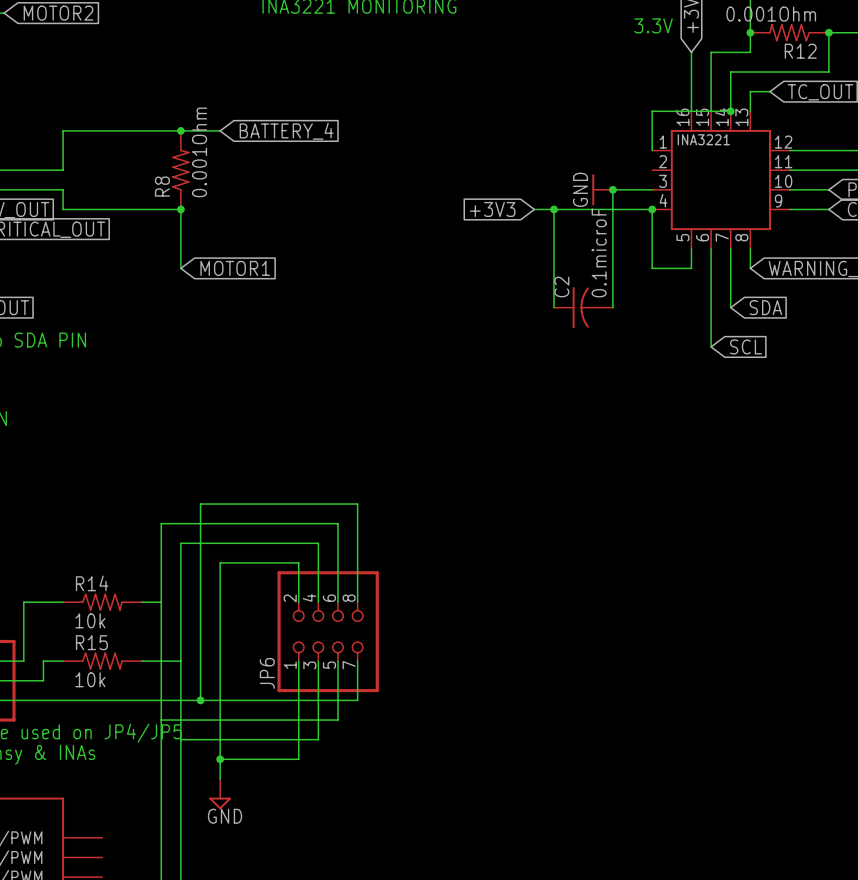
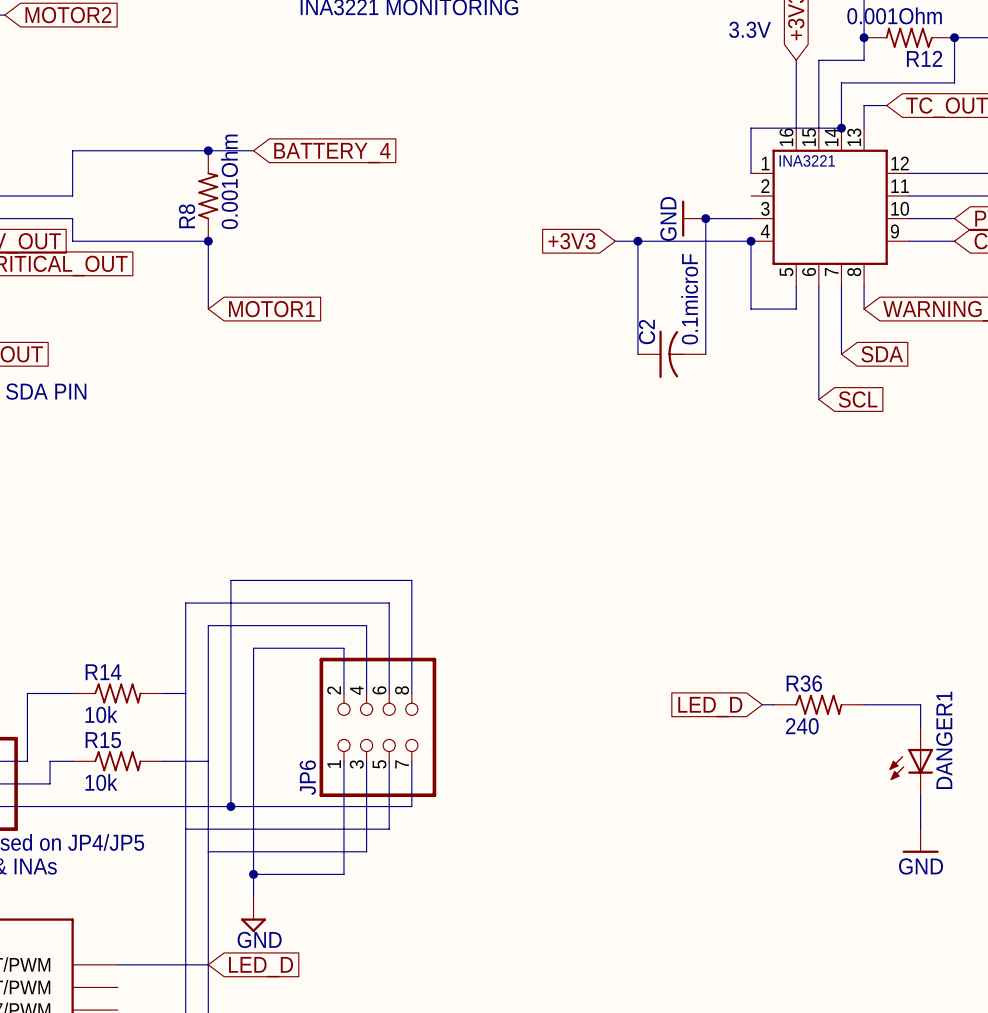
global label: none -> LED_D (710, 707)
wire: none -> (762, 704) (773, 704)
R36: none -> 240 (818, 704)
wire: none -> (864, 704) (920, 704) (920, 727)
DANGER1: none -> (911, 761)
wire: none -> (920, 795) (920, 829)
power symbol: none -> GND (920, 841)
wire: none -> (117, 964) (208, 964)
global label: none -> LED_D (261, 967)

